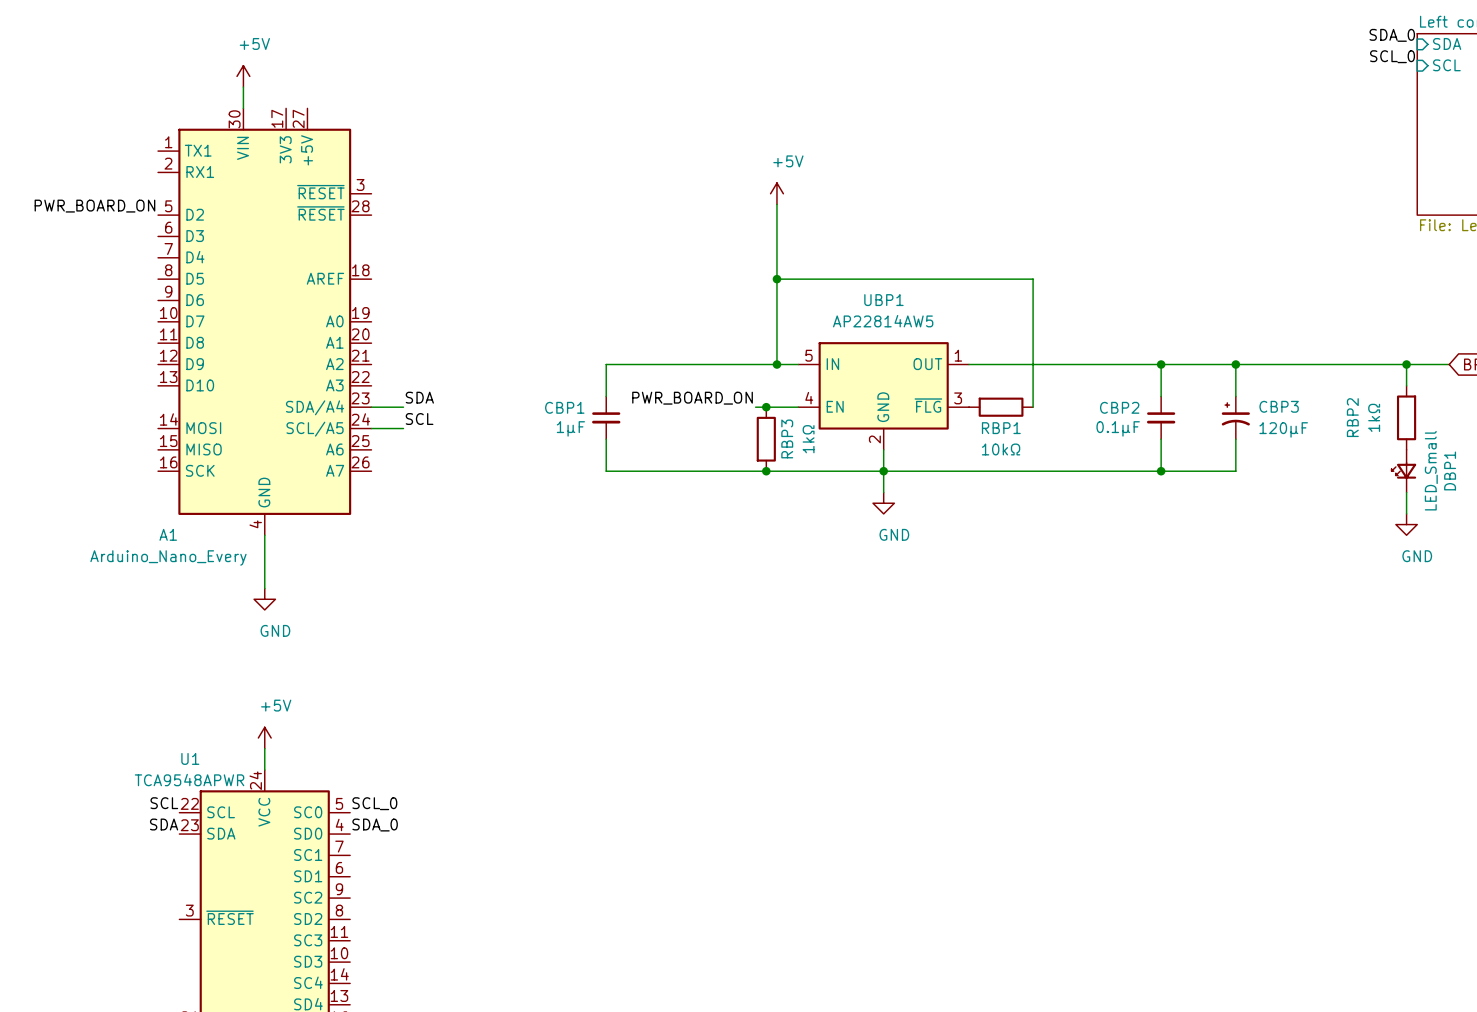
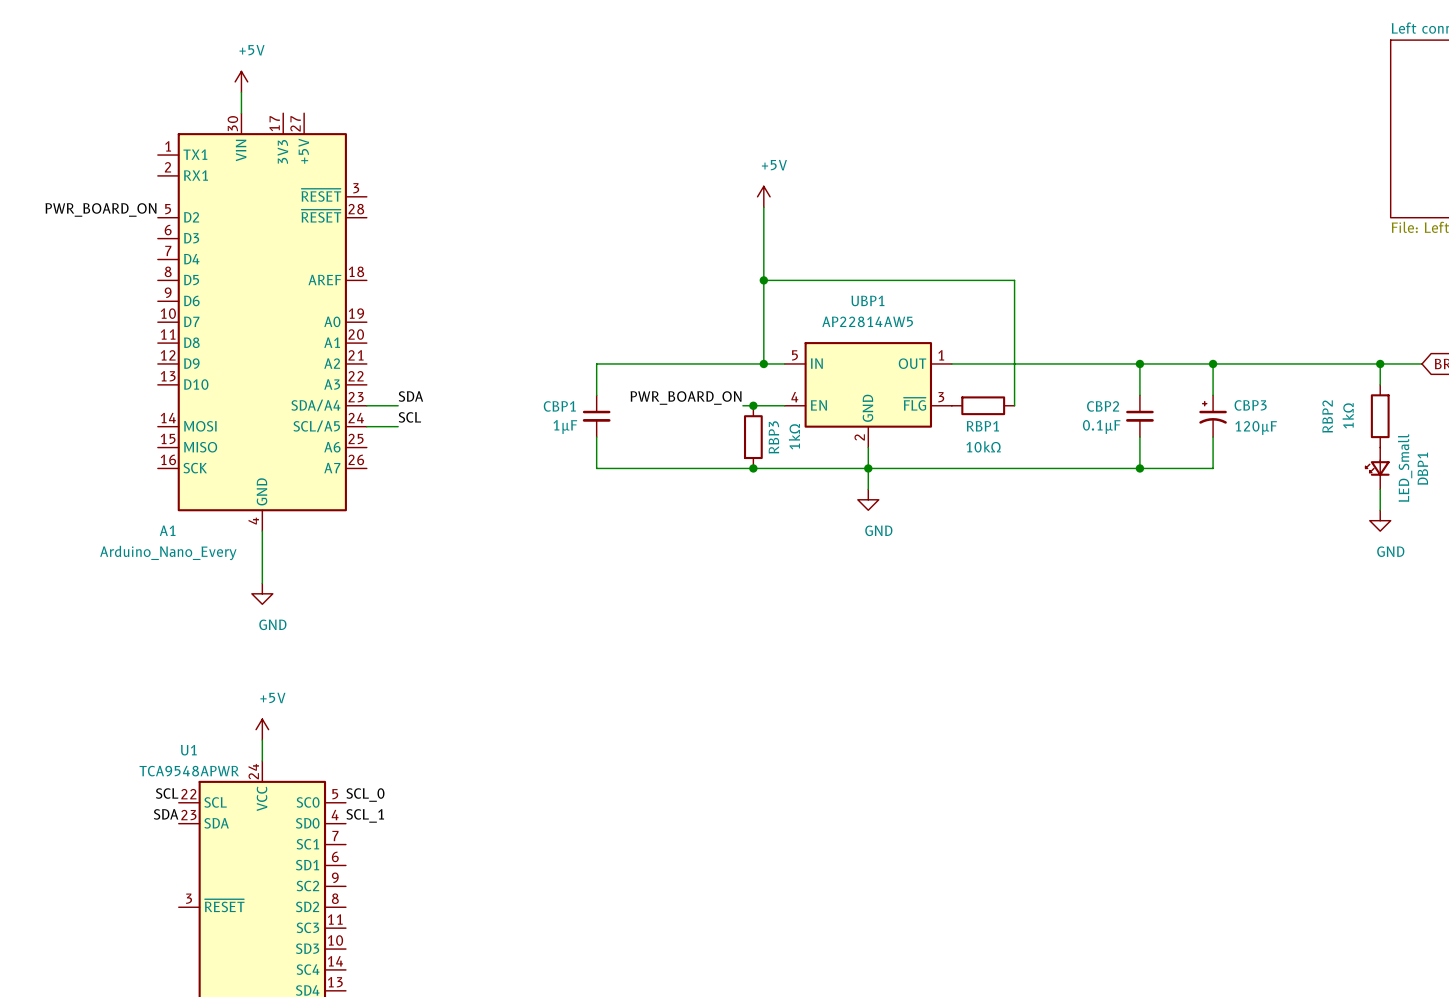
label: SDA_0 (1392, 35) -> none
sheet pin: SDA (1447, 43) -> none
label: SCL_0 (1392, 56) -> none
sheet pin: SCL (1446, 65) -> none
label: SDA_0 (375, 825) -> SCL_1 (365, 815)

